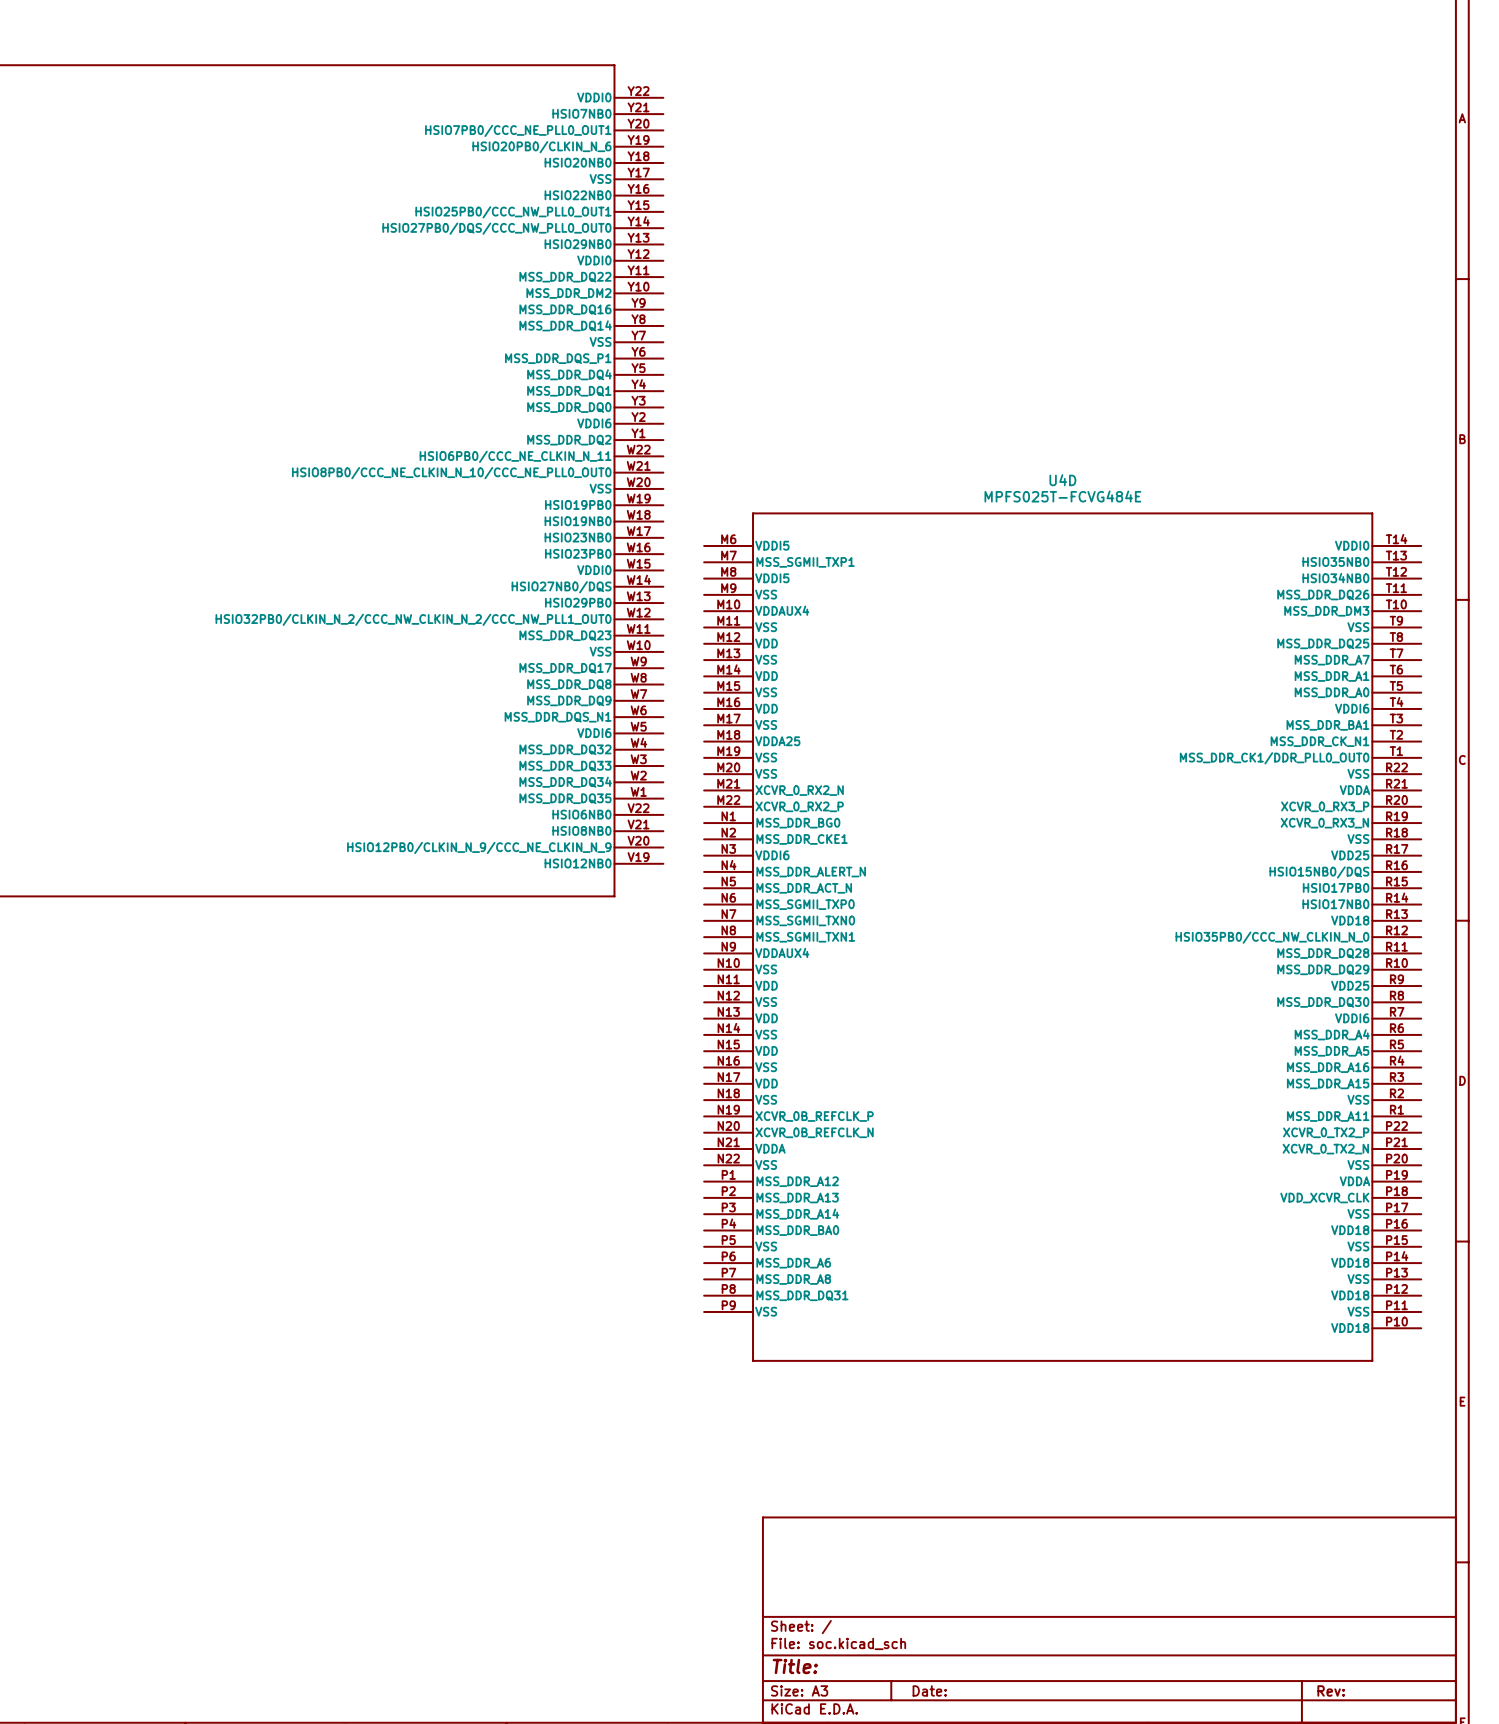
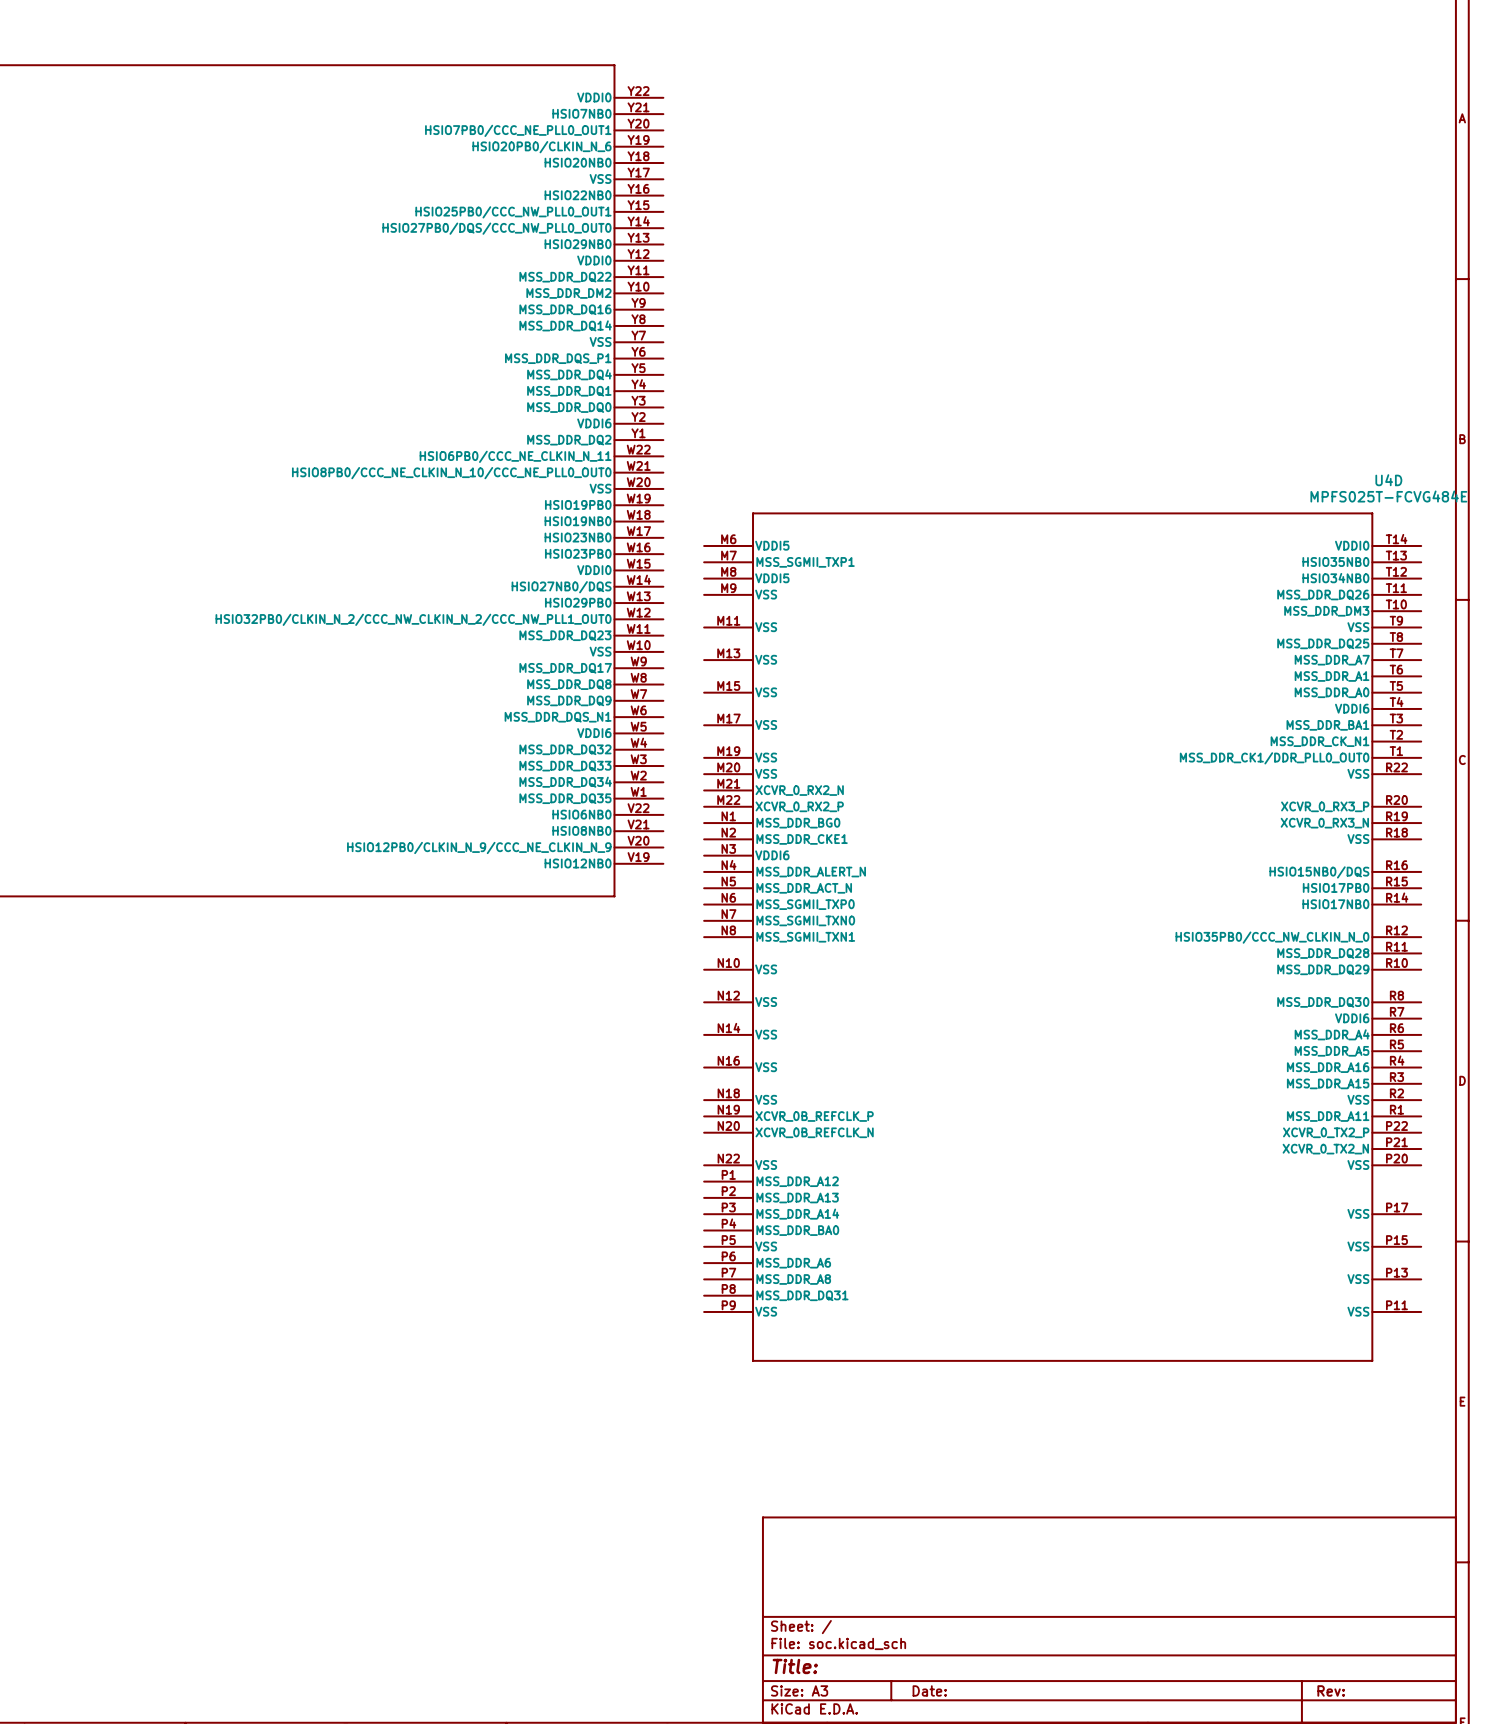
U4D name position: U4D (1062, 480) -> U4D (1388, 480)
U4D value position: MPFS025T-FCVG484E (1062, 496) -> MPFS025T-FCVG484E (1388, 496)
U4D symbol: [704, 512, 1422, 1362] -> [704, 512, 1422, 1362]

